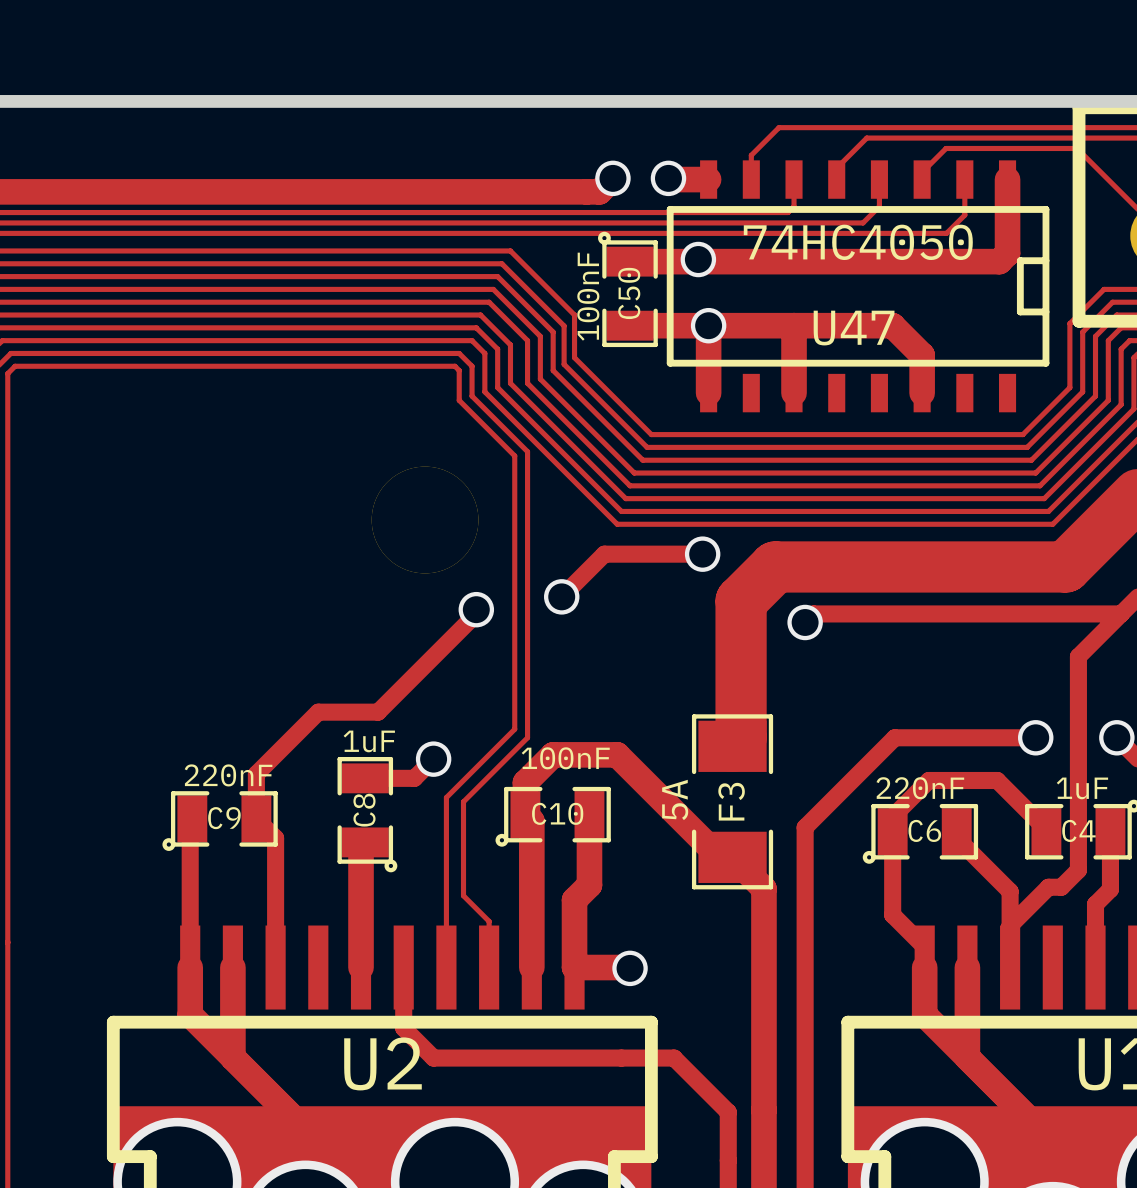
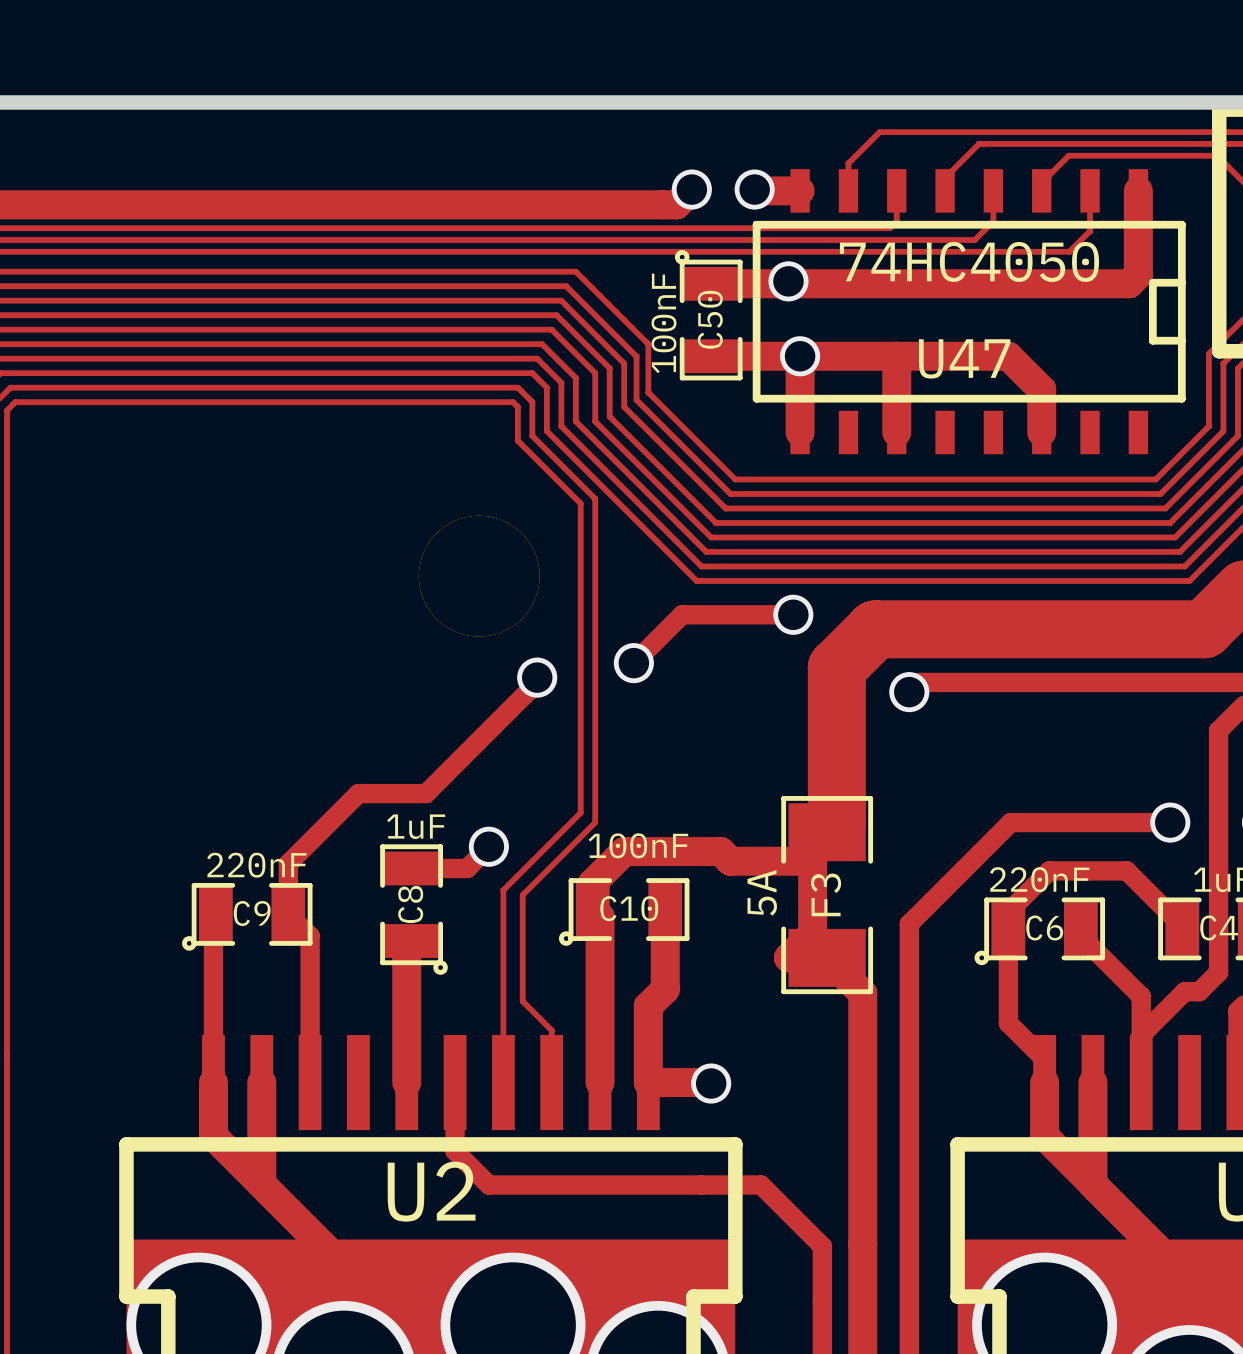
track: (525, 791) (525, 782) (553, 754) (617, 754) (719, 857) -> (592, 882) (624, 851) (720, 851) (730, 861) (812, 861) (812, 933) (788, 957) (812, 957)

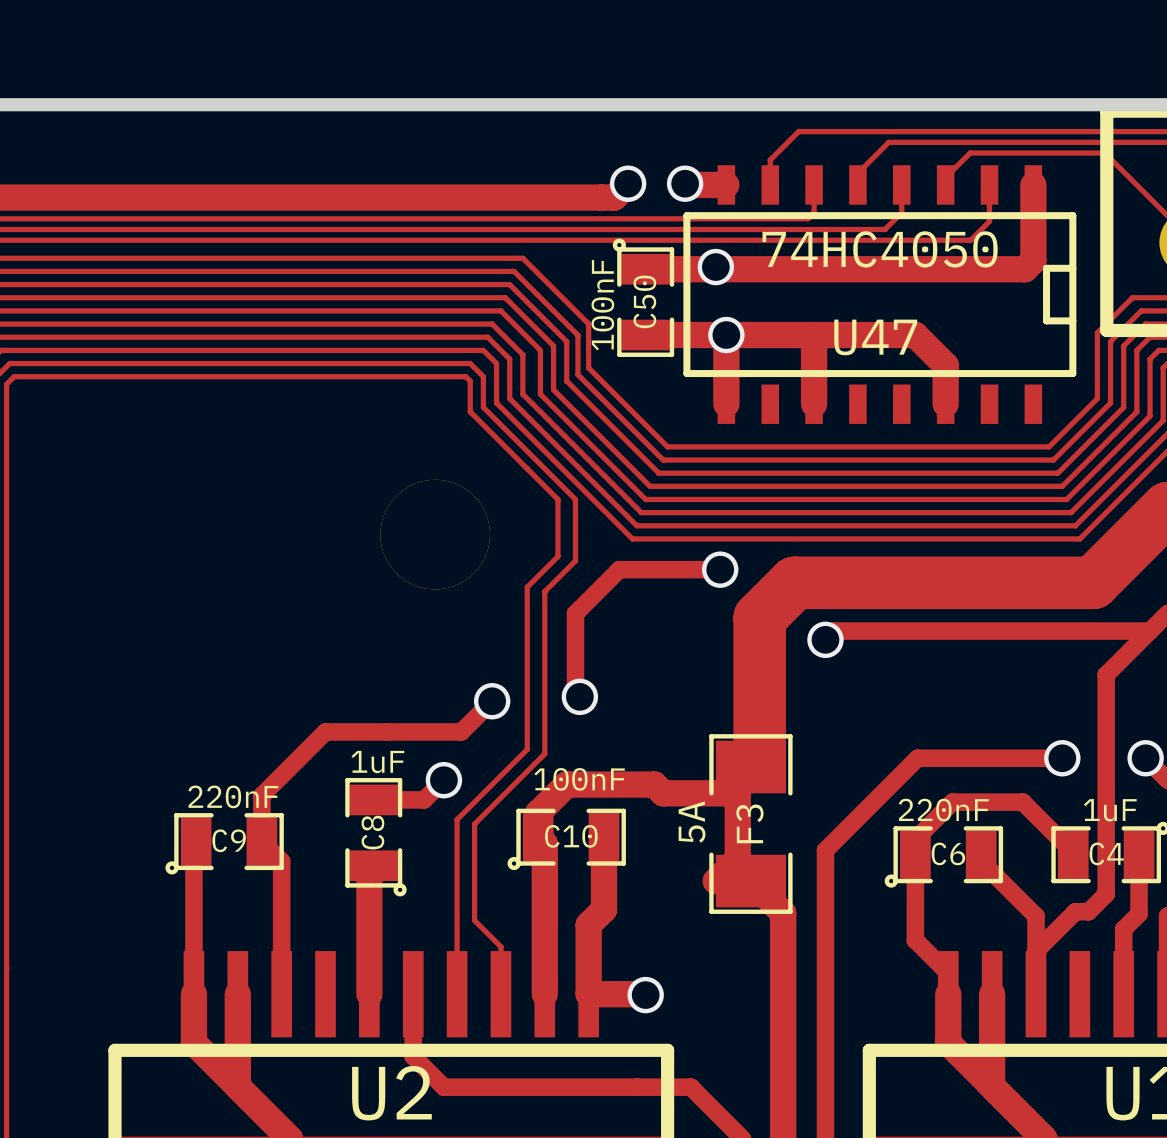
track: (595, 498) (595, 822) -> (540, 464) (575, 499) (575, 560) (544, 591) (544, 753) (540, 758)
track: (580, 503) (580, 634) -> (527, 468) (557, 499) (557, 556) (527, 587)
track: none -> (575, 613) (575, 692) (579, 696)
via: (633, 663) -> none
track: (537, 677) (537, 682) (426, 793) -> (492, 701) (461, 731) (386, 731)
via: (537, 677) -> none
via: none -> (579, 696)
via: none -> (492, 701)

